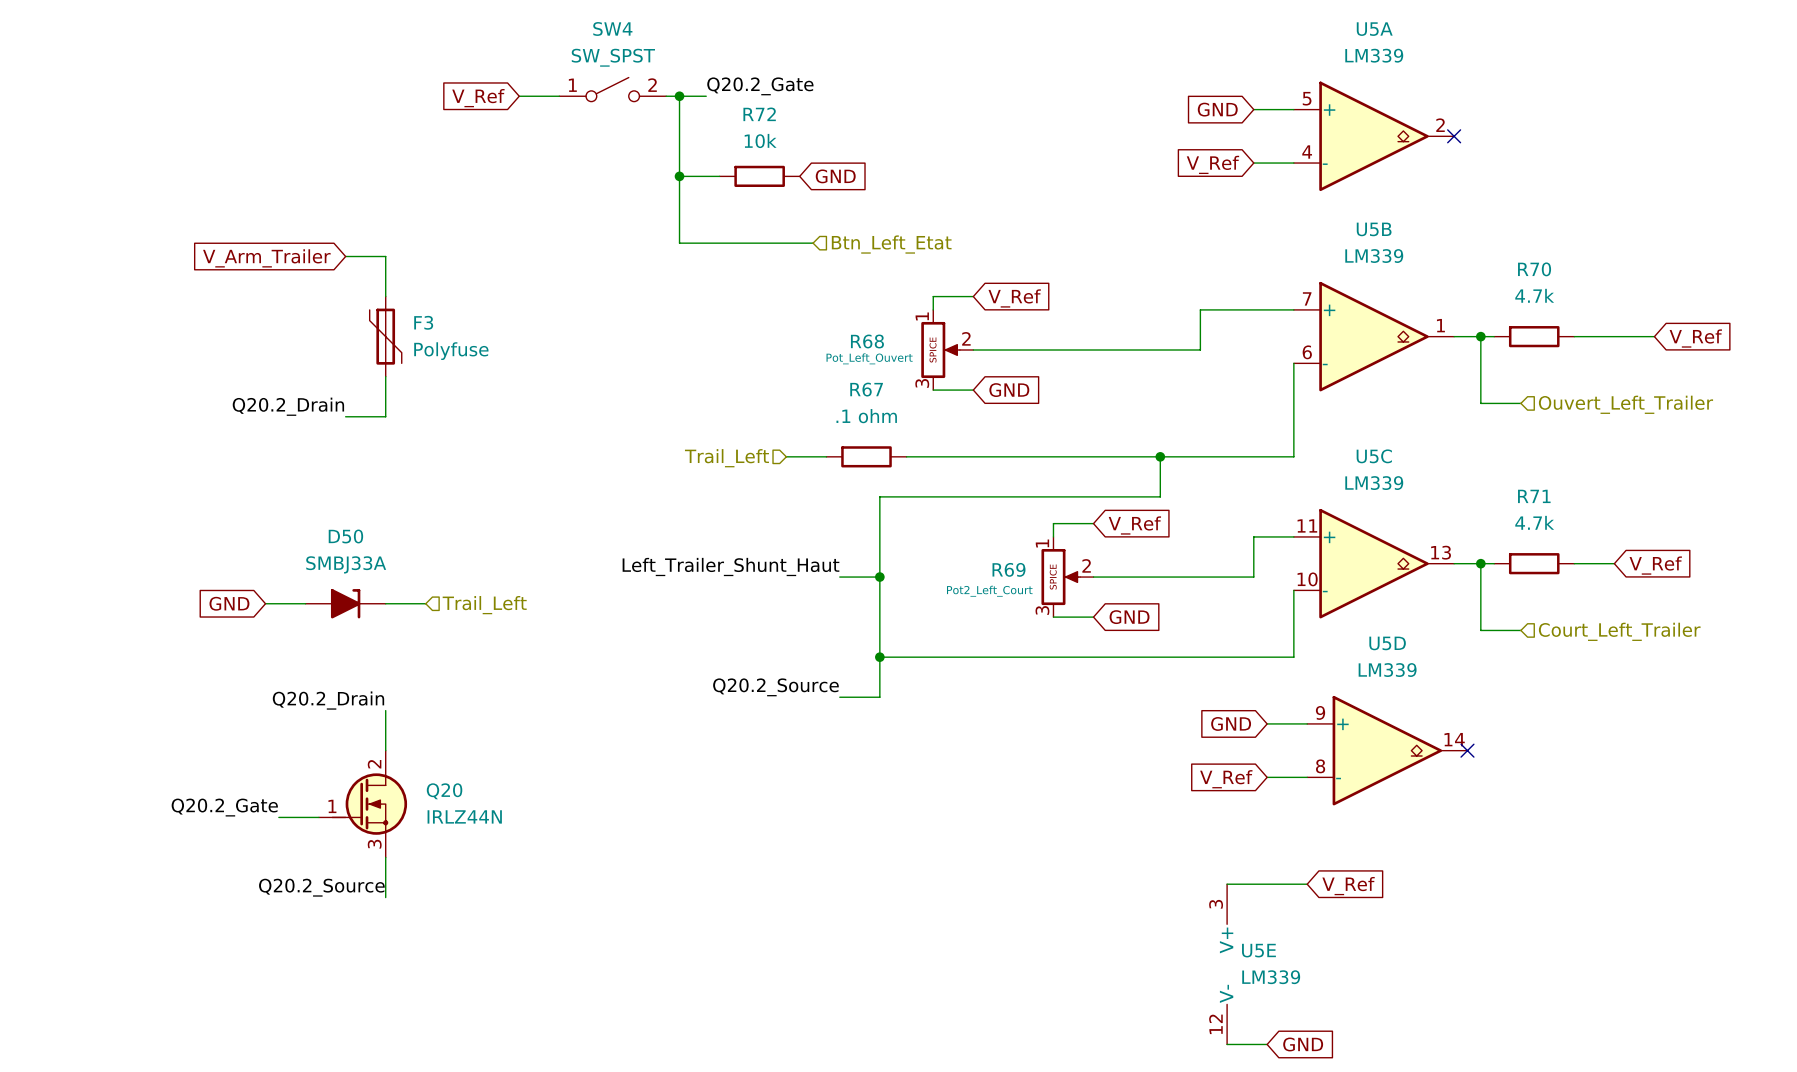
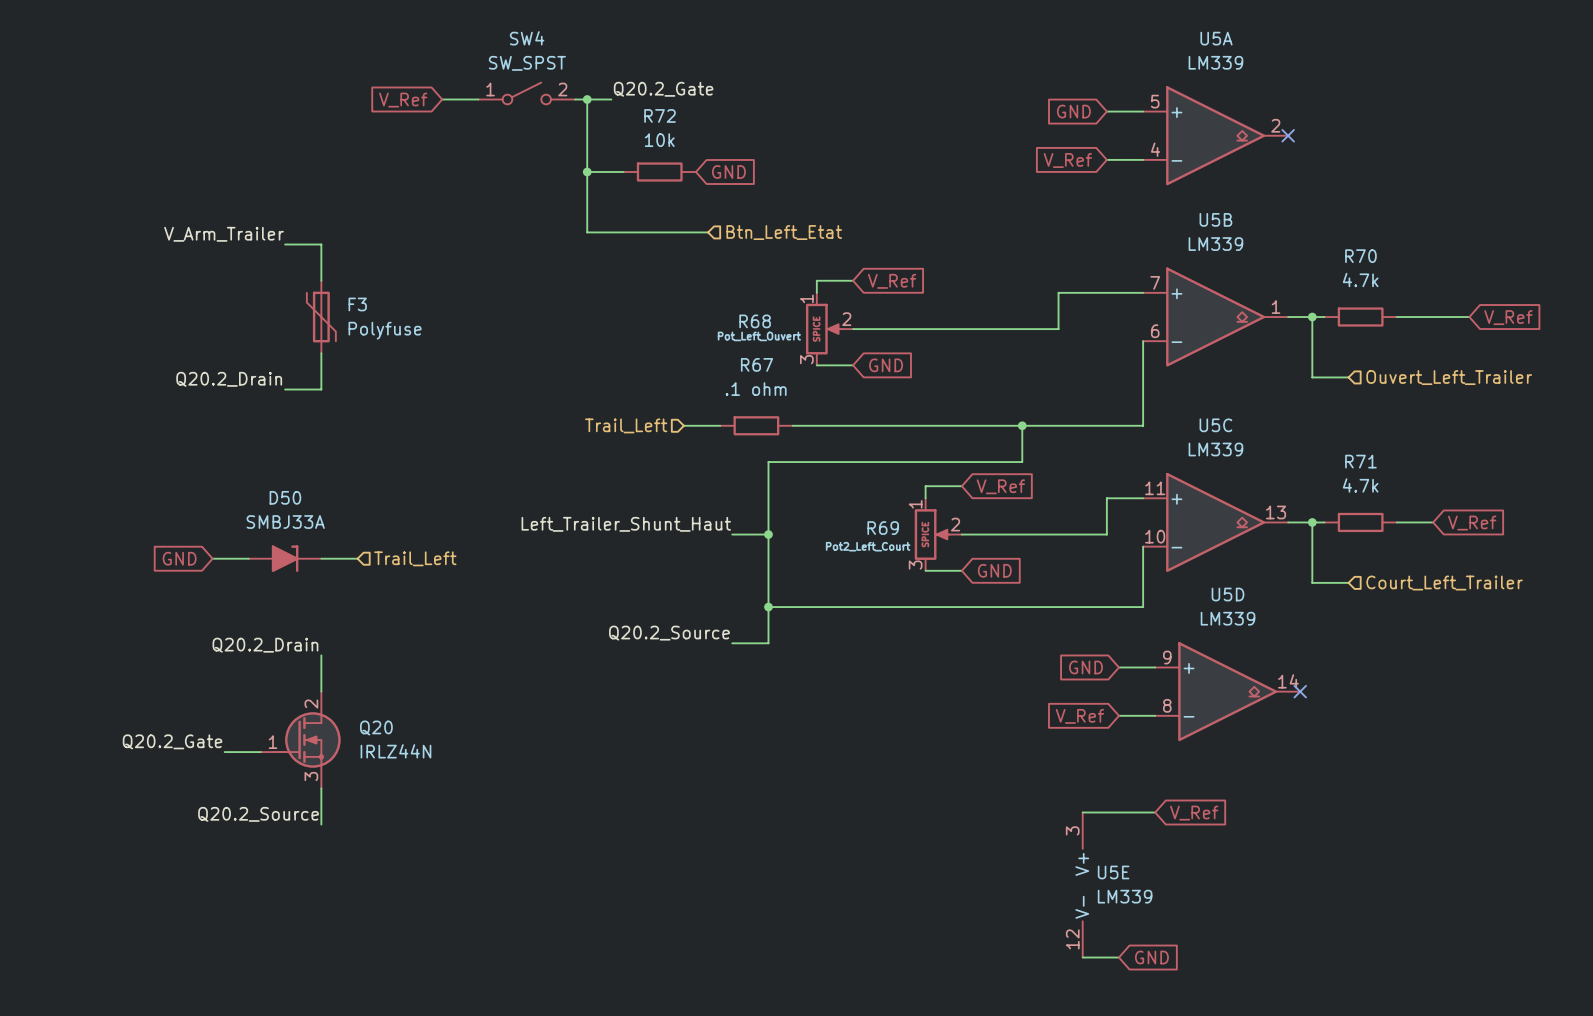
label: none -> V_Arm_Trailer (224, 234)
global label: V_Arm_Trailer (266, 258) -> none

